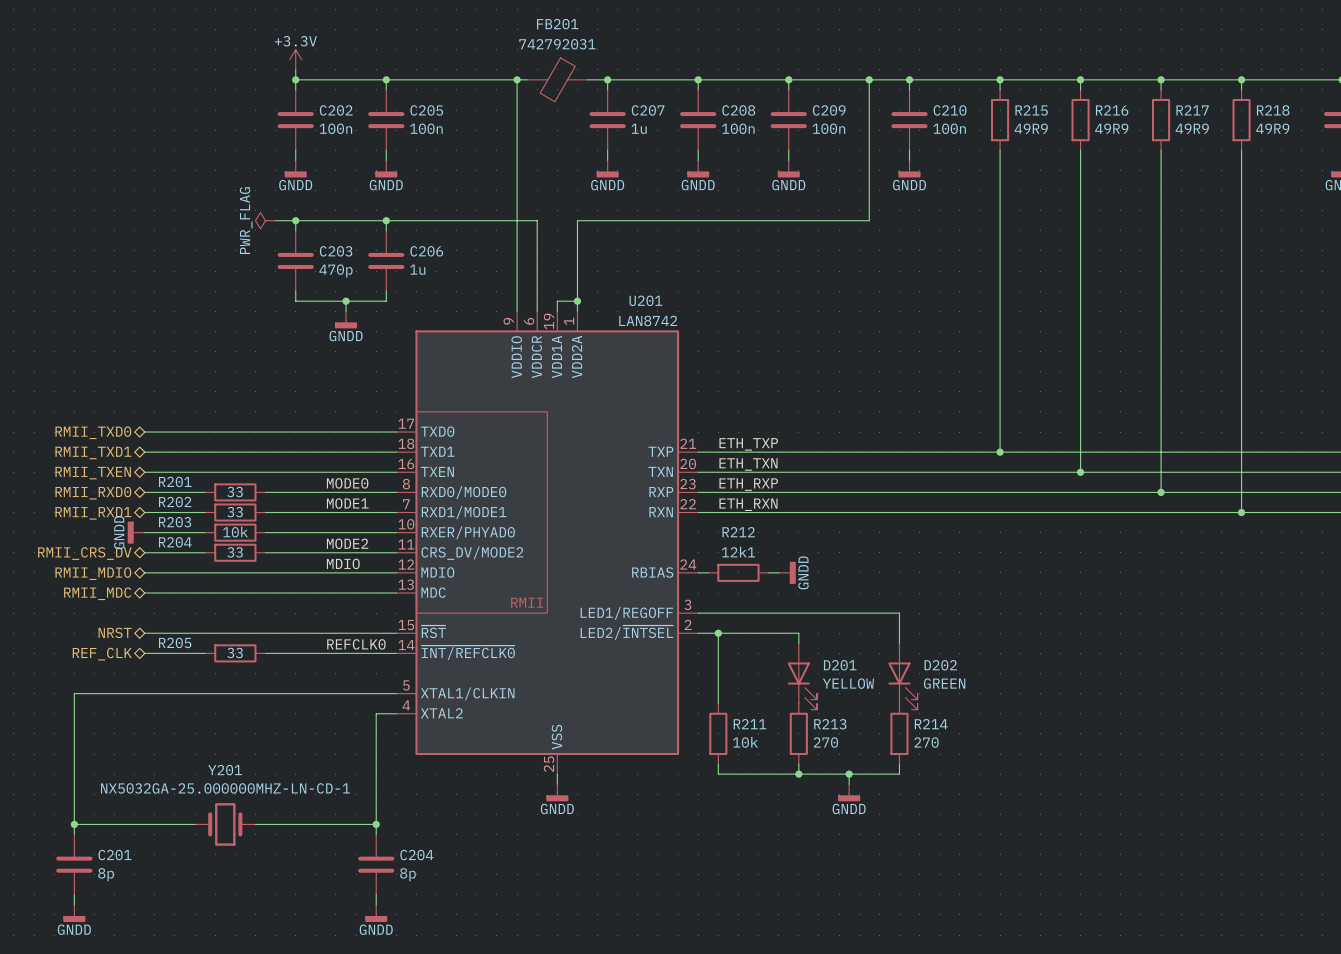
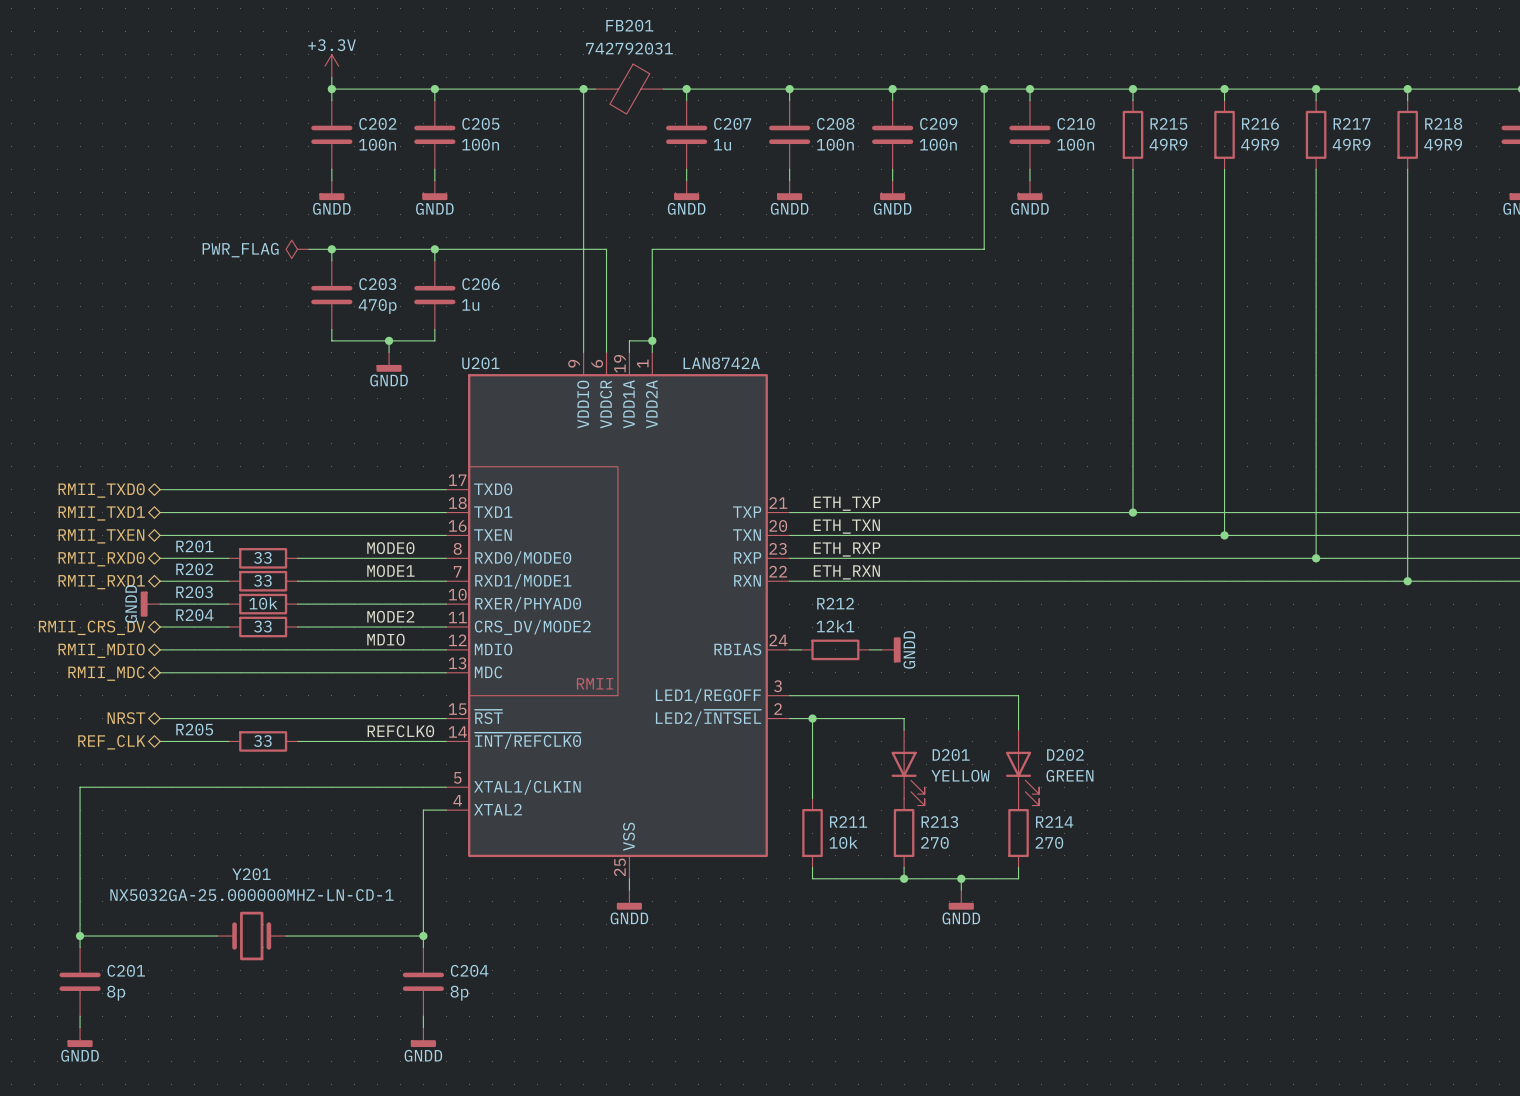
power symbol text rotation: 0° (246, 220) -> 90° clockwise (240, 250)
U201 name position: U201 (645, 300) -> U201 (480, 363)
U201 value: LAN8742 (648, 320) -> LAN8742A (721, 363)

